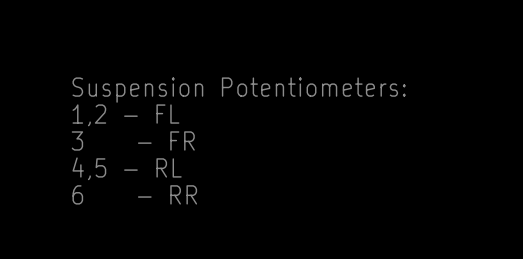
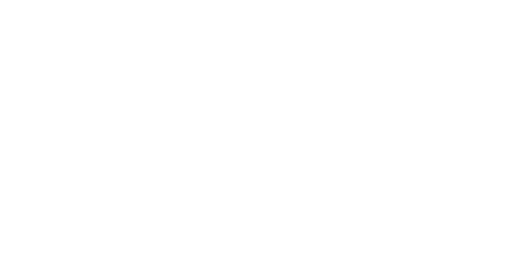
text: Suspension Potentiometers: (239, 90) -> none
text: 1,2 - FL (125, 115) -> none
text: 3 - FR (133, 140) -> none
text: 4,5 - RL (127, 168) -> none
text: 6 - RR (134, 194) -> none

